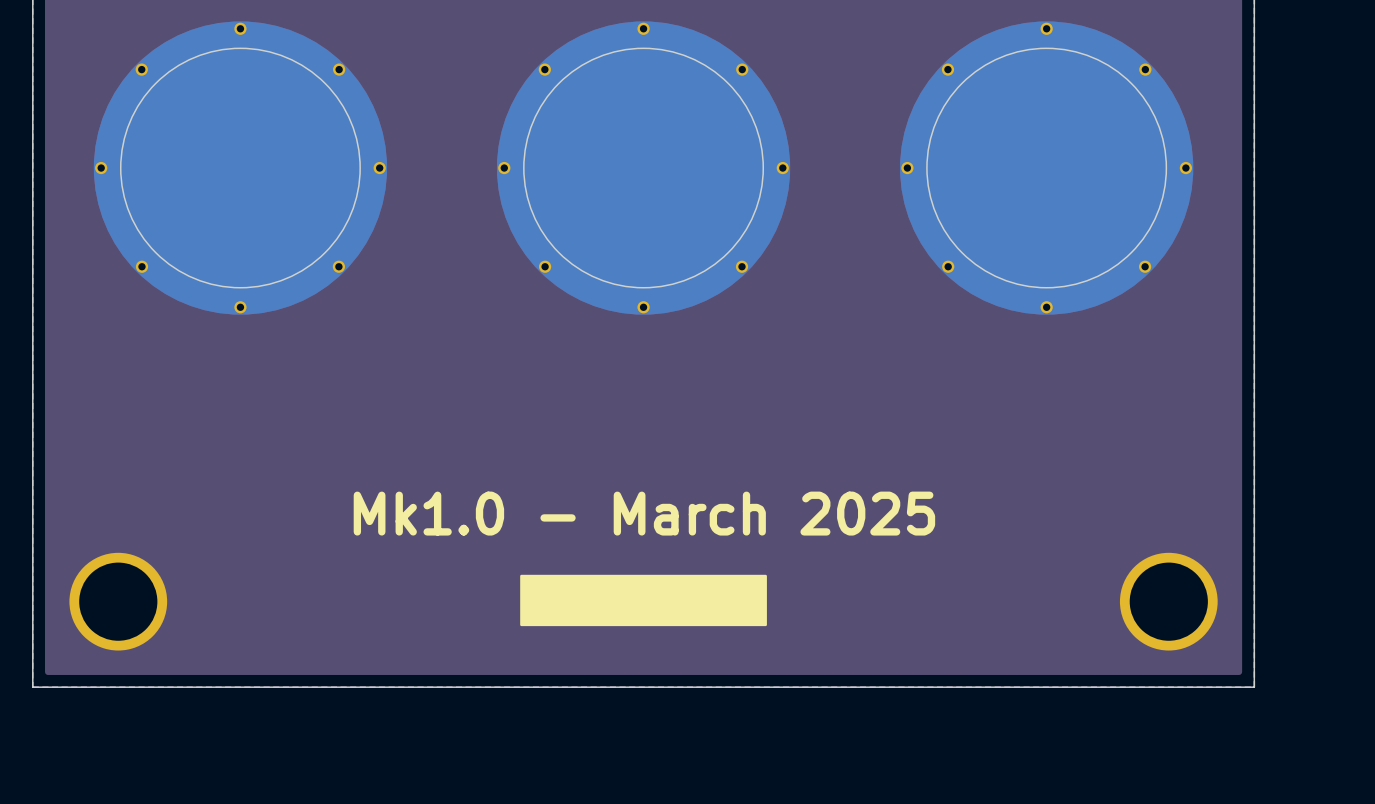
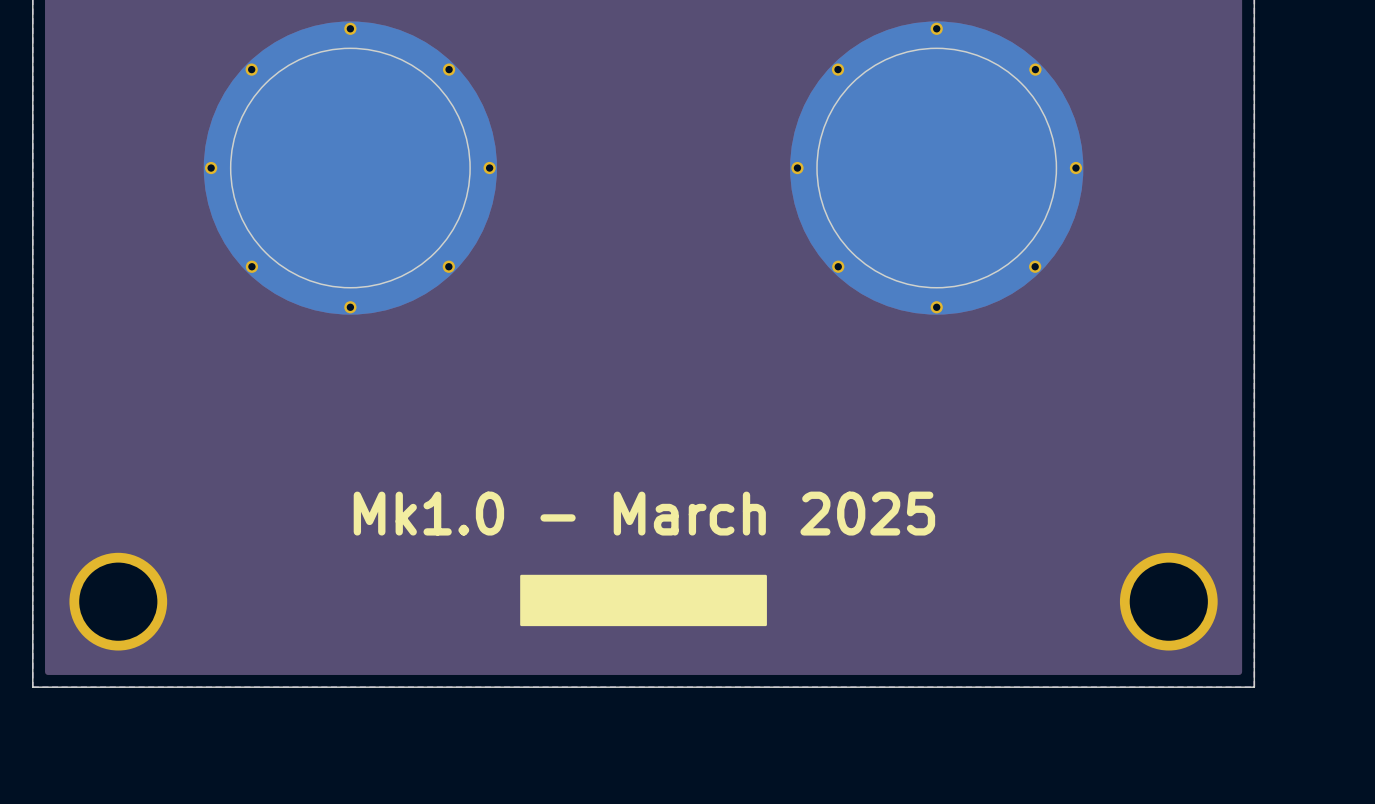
part position: (240, 168) -> (350, 168)
part: (643, 168) -> none
part position: (1046, 168) -> (936, 168)

